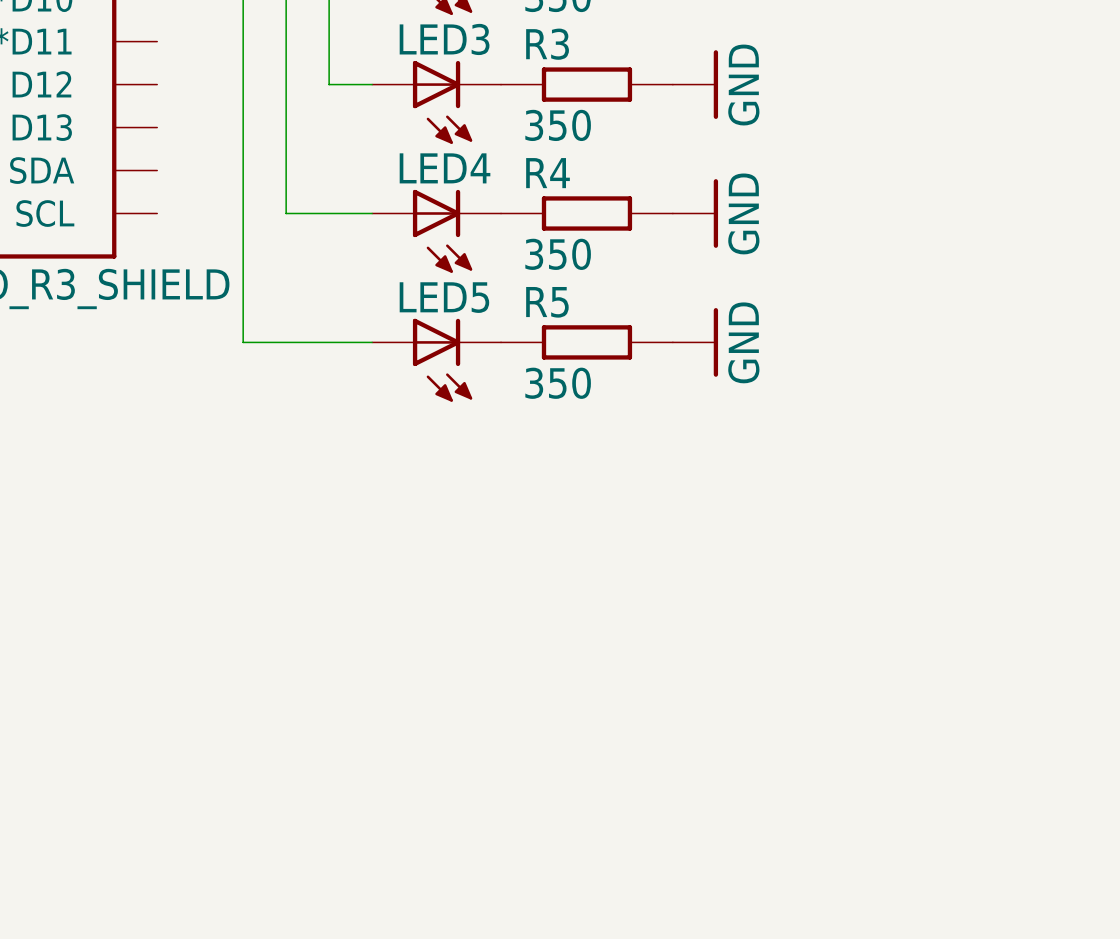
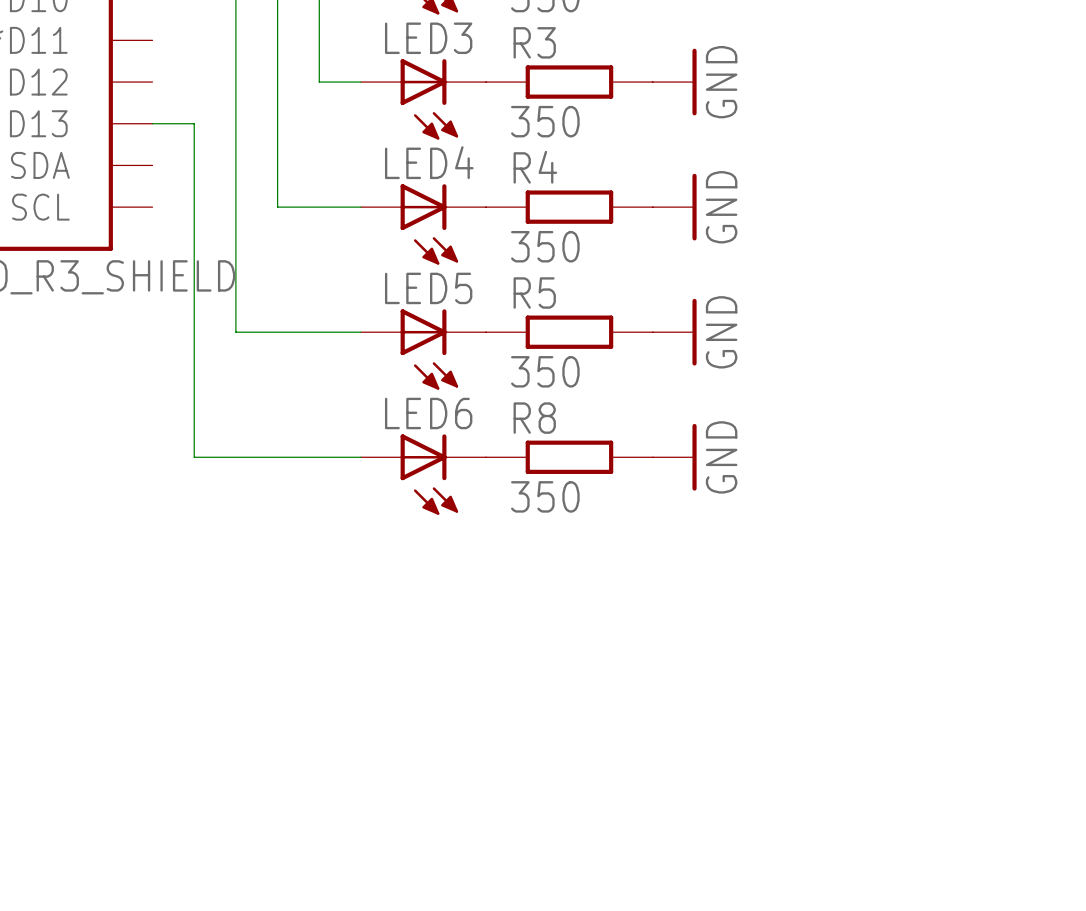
wire: none -> (152, 123) (194, 123) (194, 457) (360, 457)
R8: none -> 350 (569, 457)
power symbol: none -> GND (674, 457)
LED6: none -> (423, 474)

